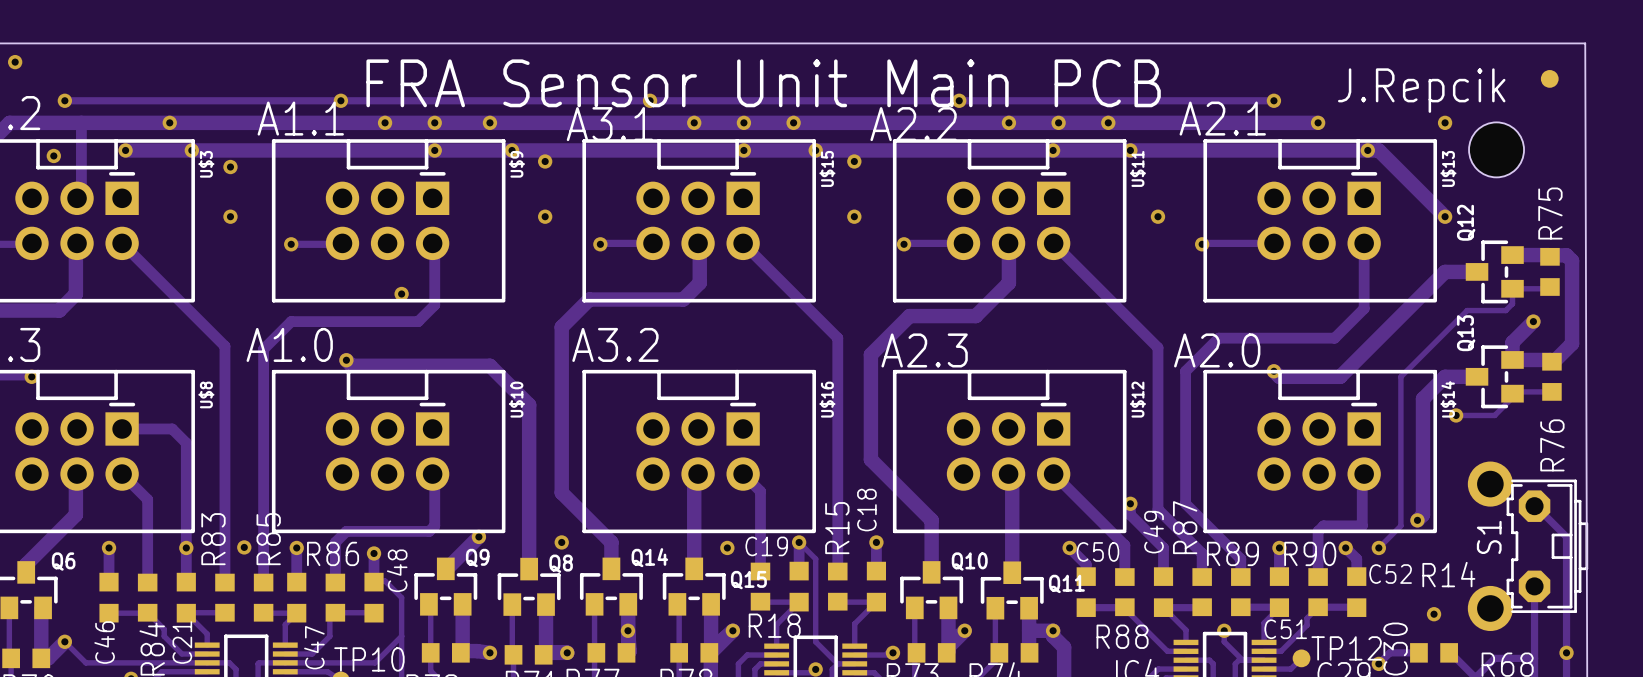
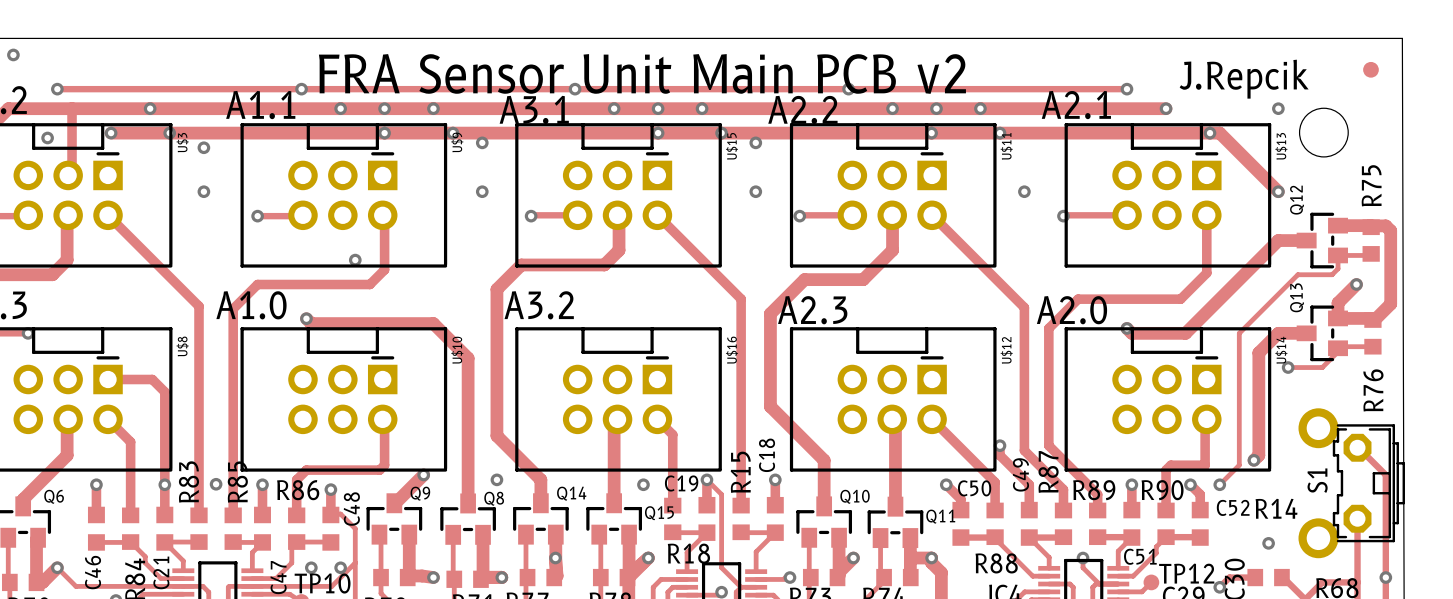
text: FRA Sensor Unit Main PCB (763, 83) -> FRA Sensor Unit Main PCB v2 (642, 73)
via: none -> (311, 567)
via: none -> (340, 567)

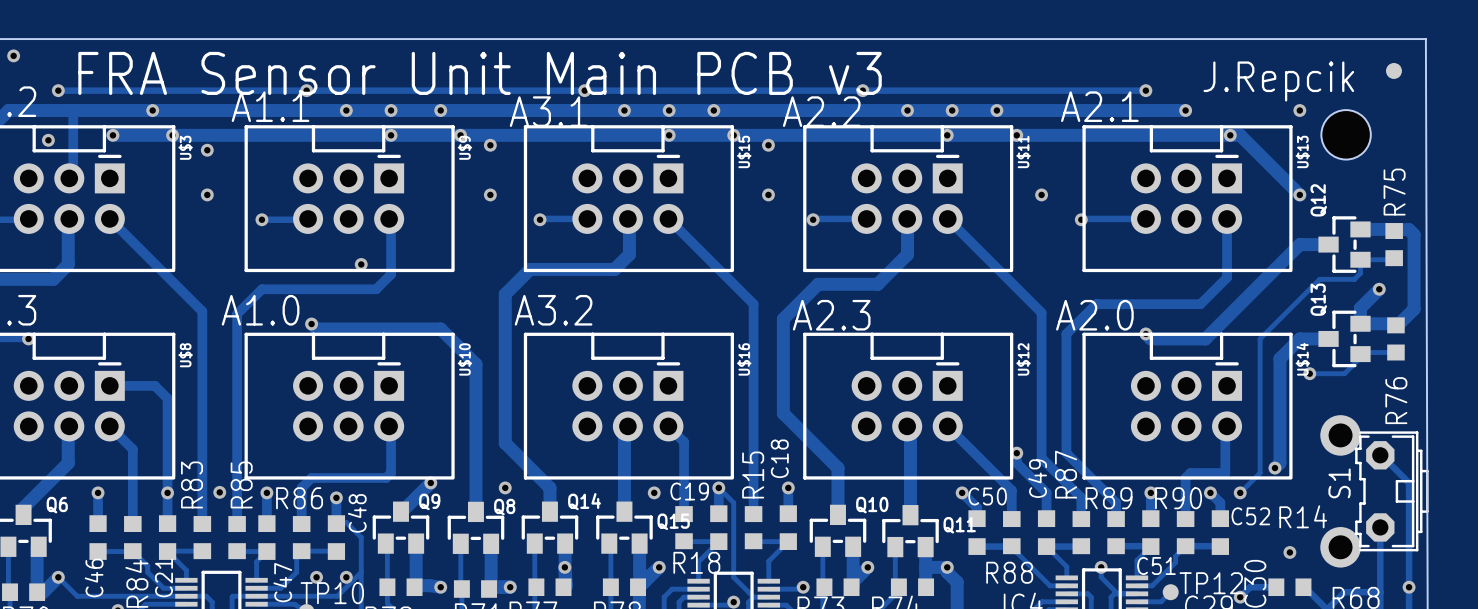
text: FRA Sensor Unit Main PCB v2 (642, 73) -> FRA Sensor Unit Main PCB v3 (480, 73)

